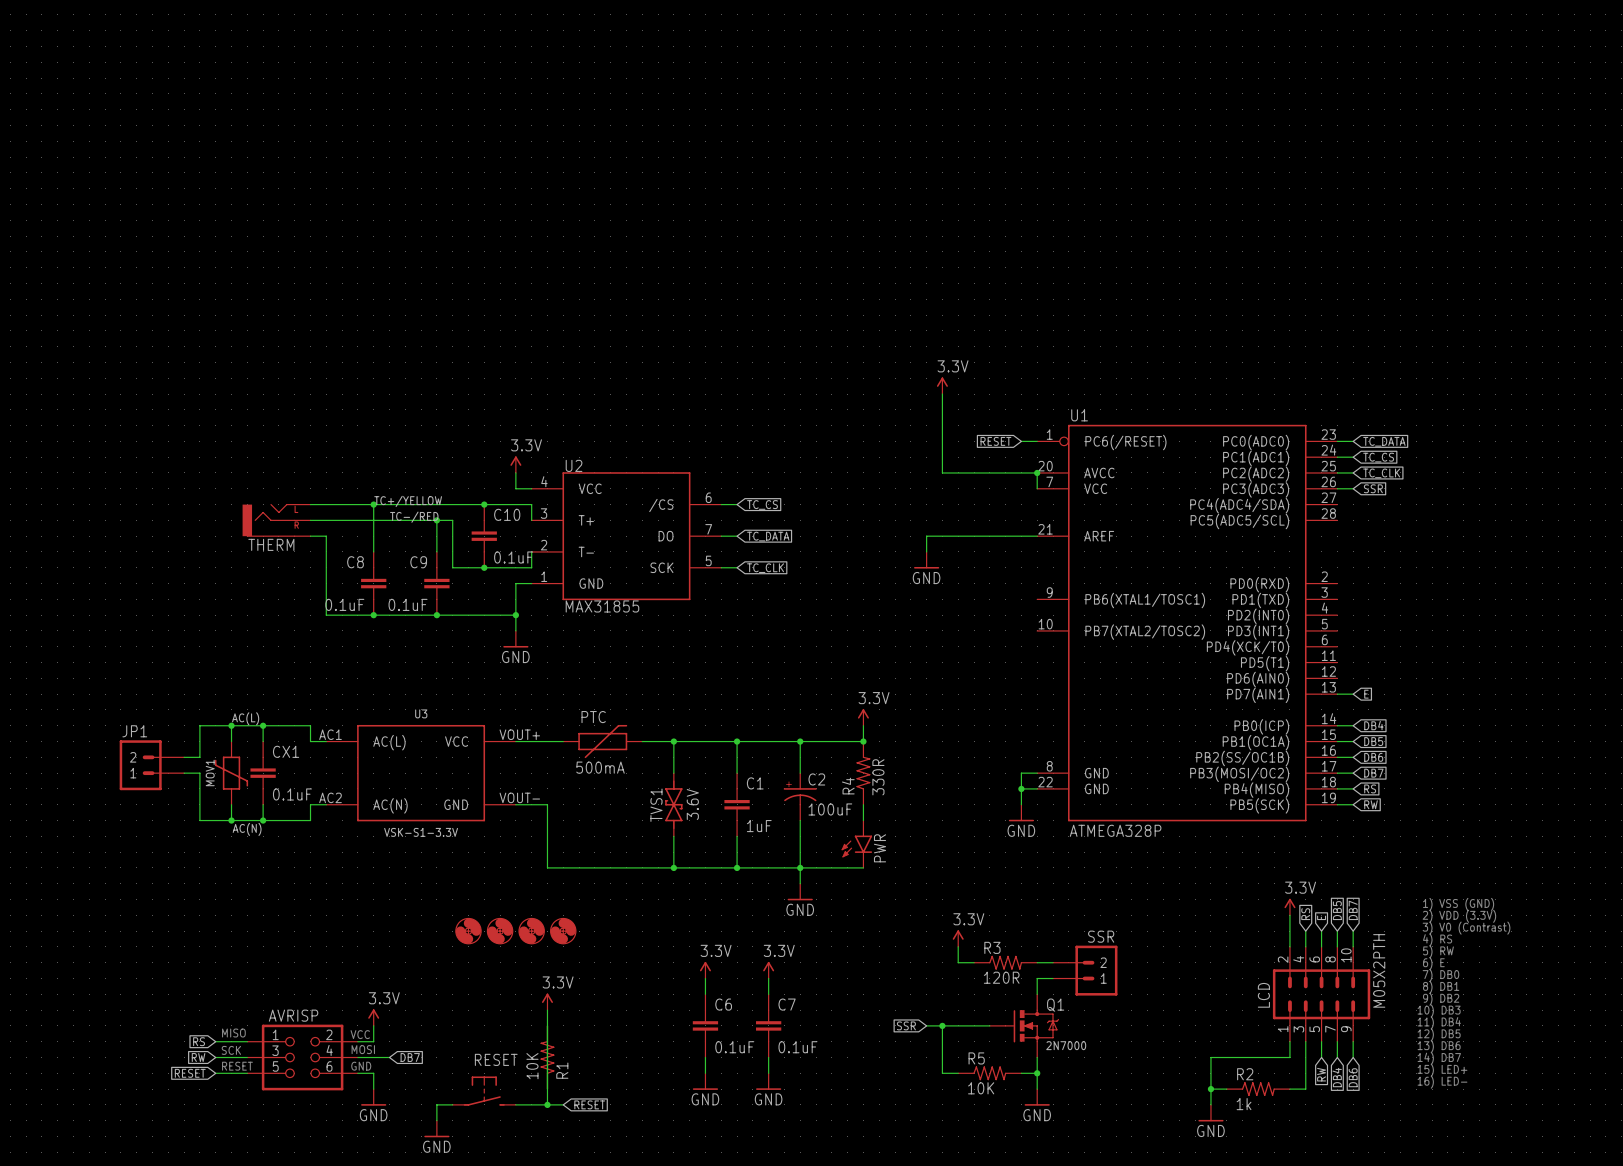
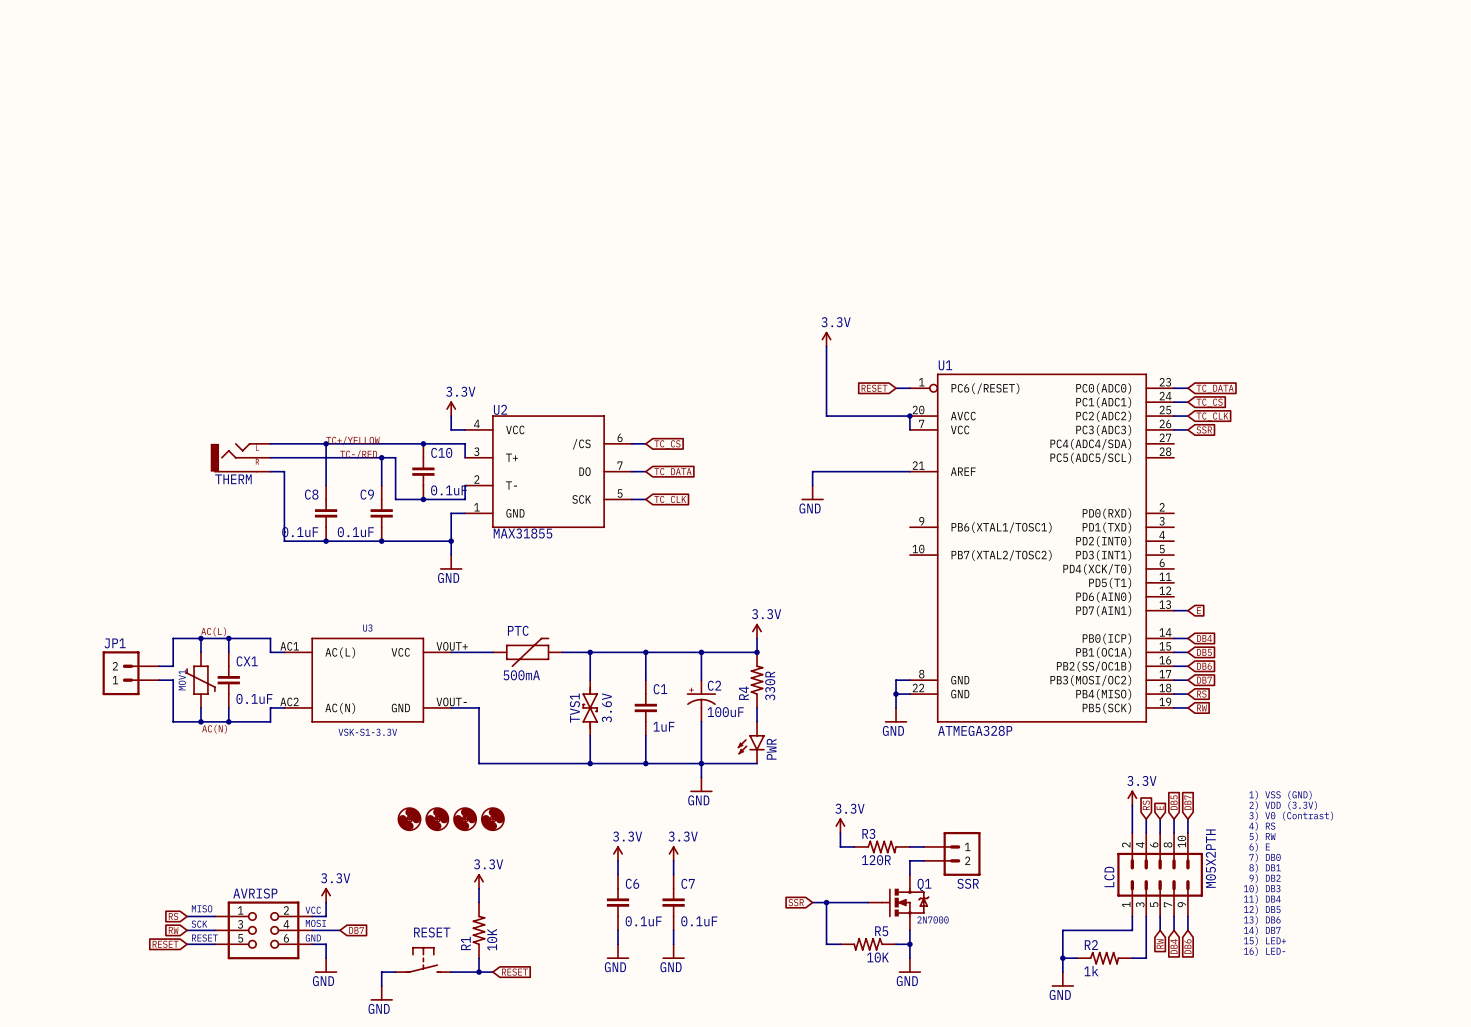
SSR flip: as is (1096, 970) -> up-down (962, 853)
R1 flip: as is (547, 1057) -> left-right (479, 930)
R5 flip: as is (989, 1073) -> left-right (868, 944)

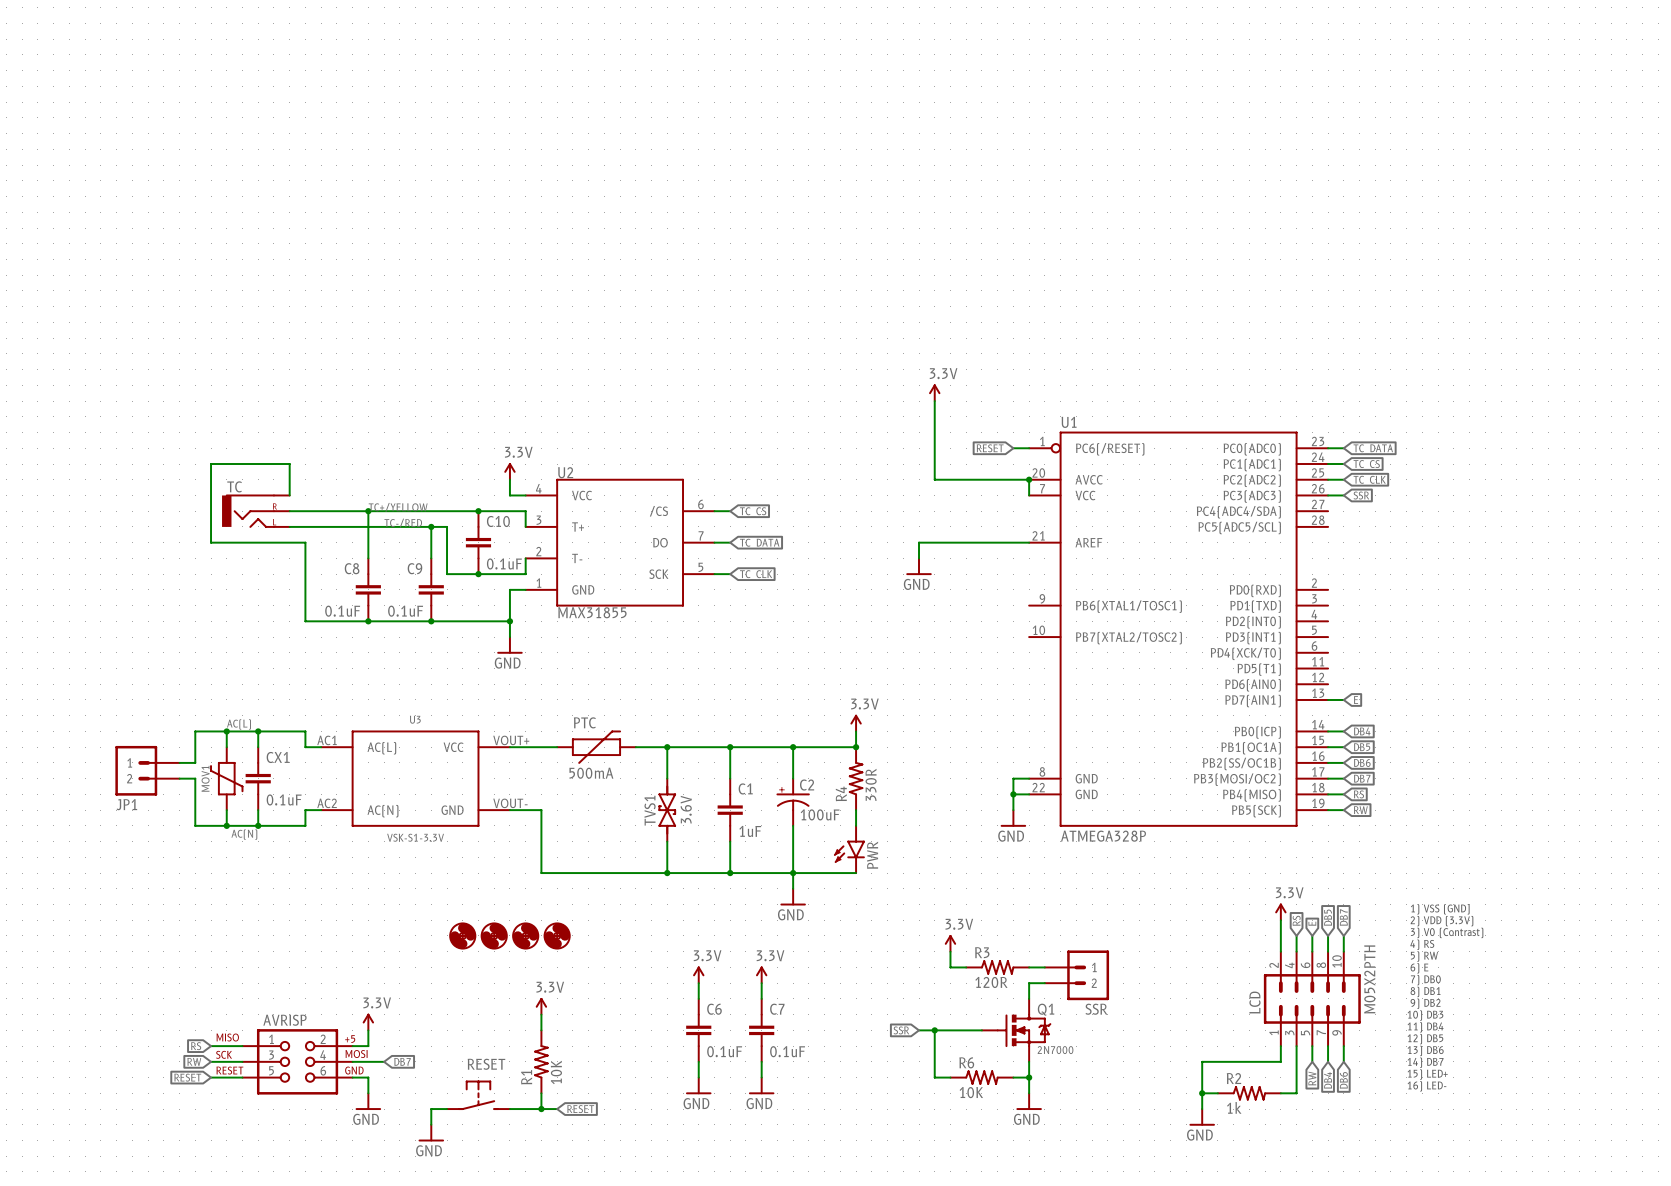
TC: none -> (255, 511)
THERM: (240, 457) -> none
wire: (270, 471) (284, 471) (284, 541) -> (289, 495) (289, 464) (211, 464) (211, 542) (305, 542) (305, 621) (321, 621)
JP1 flip: as is (121, 673) -> up-down (136, 770)
AVRISP symbol: [214, 901, 313, 960] -> [242, 1029, 353, 1095]
R5: 10K (868, 944) -> none
R6: none -> 10K (981, 1077)

